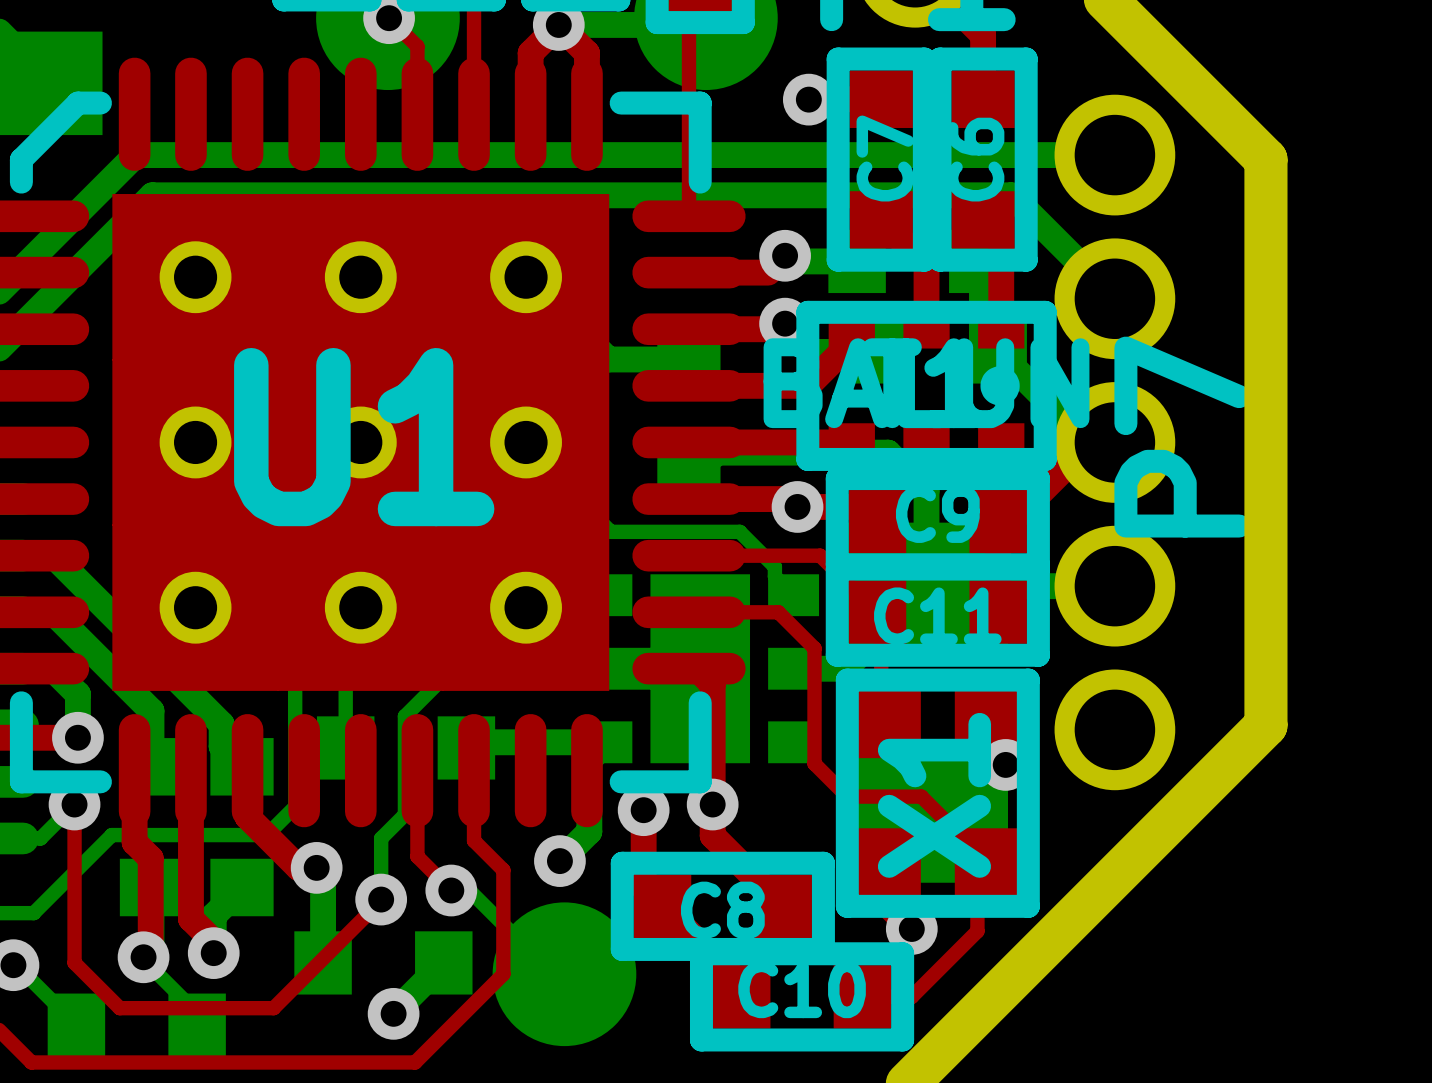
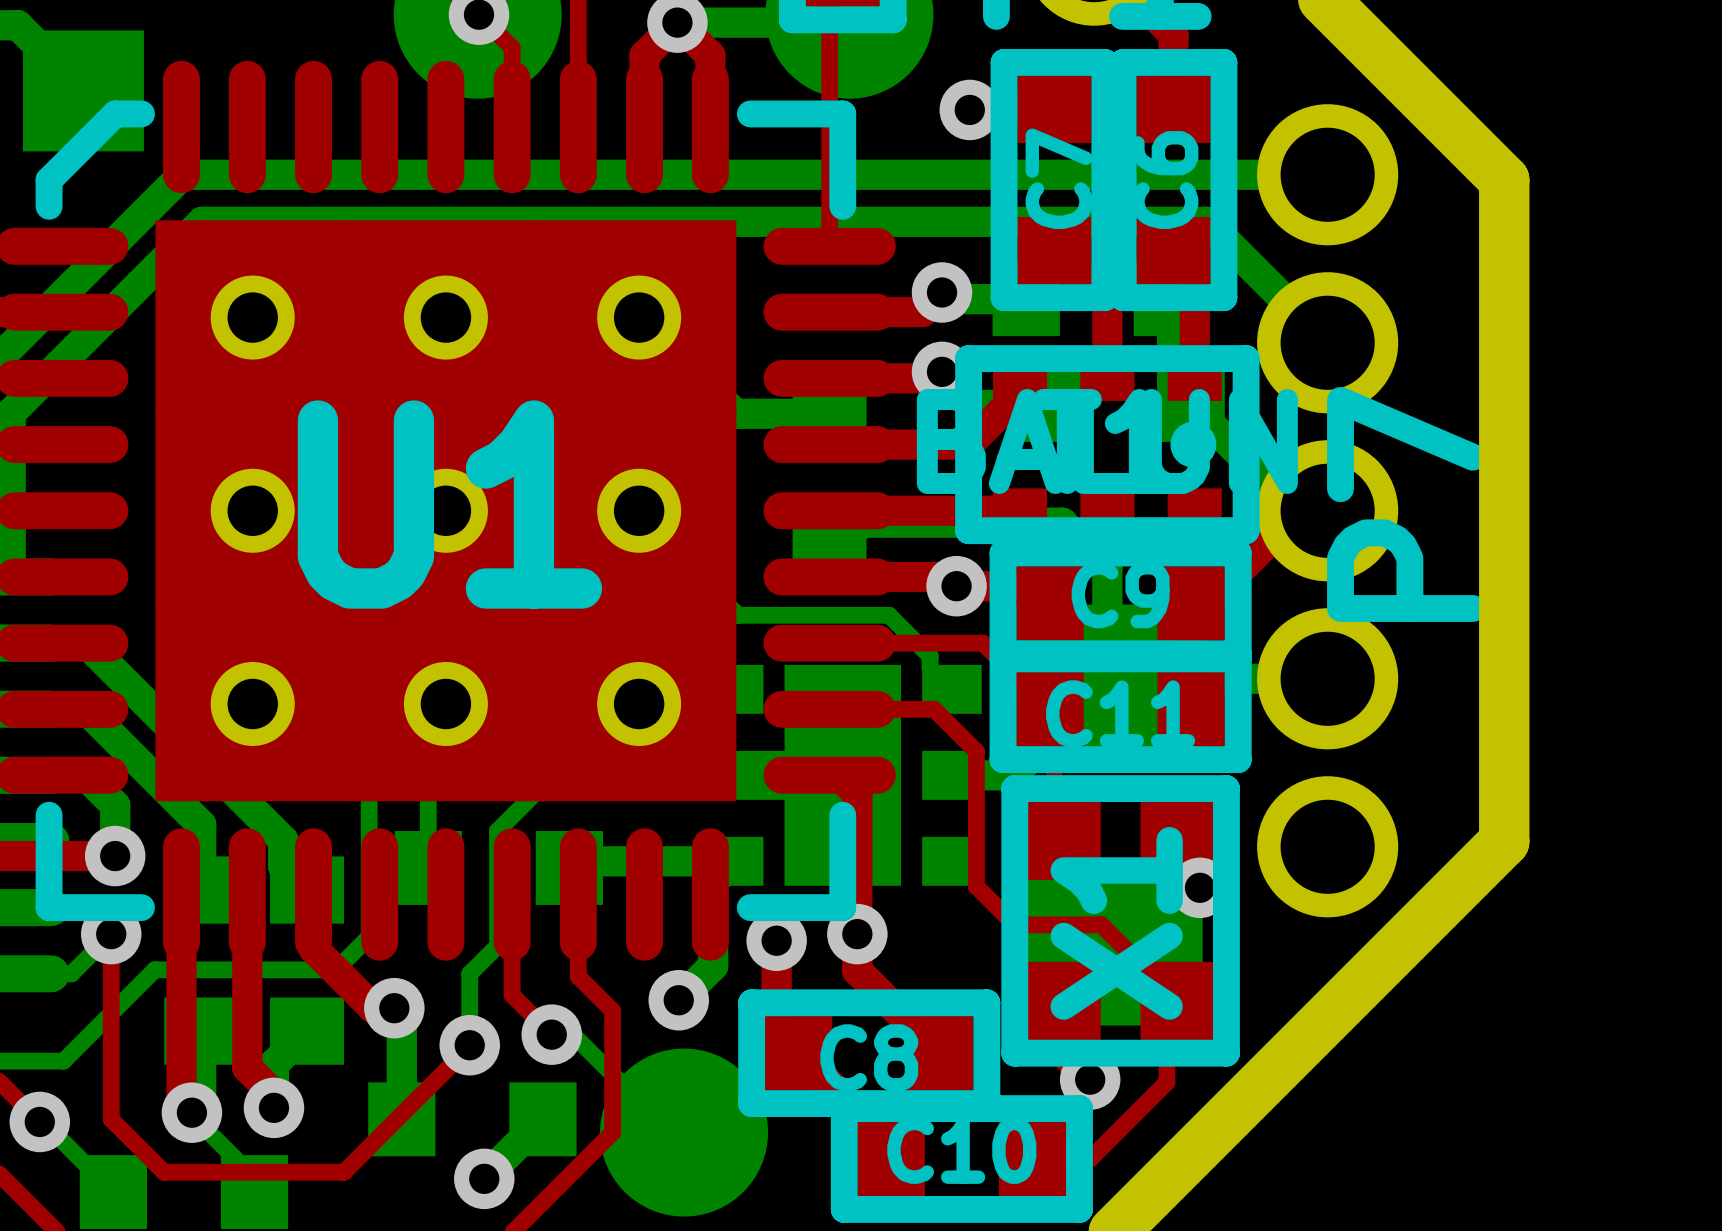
top track: (134, 842) (150, 858) (150, 950) (143, 957) -> (181, 978) (181, 1102) (191, 1112)

